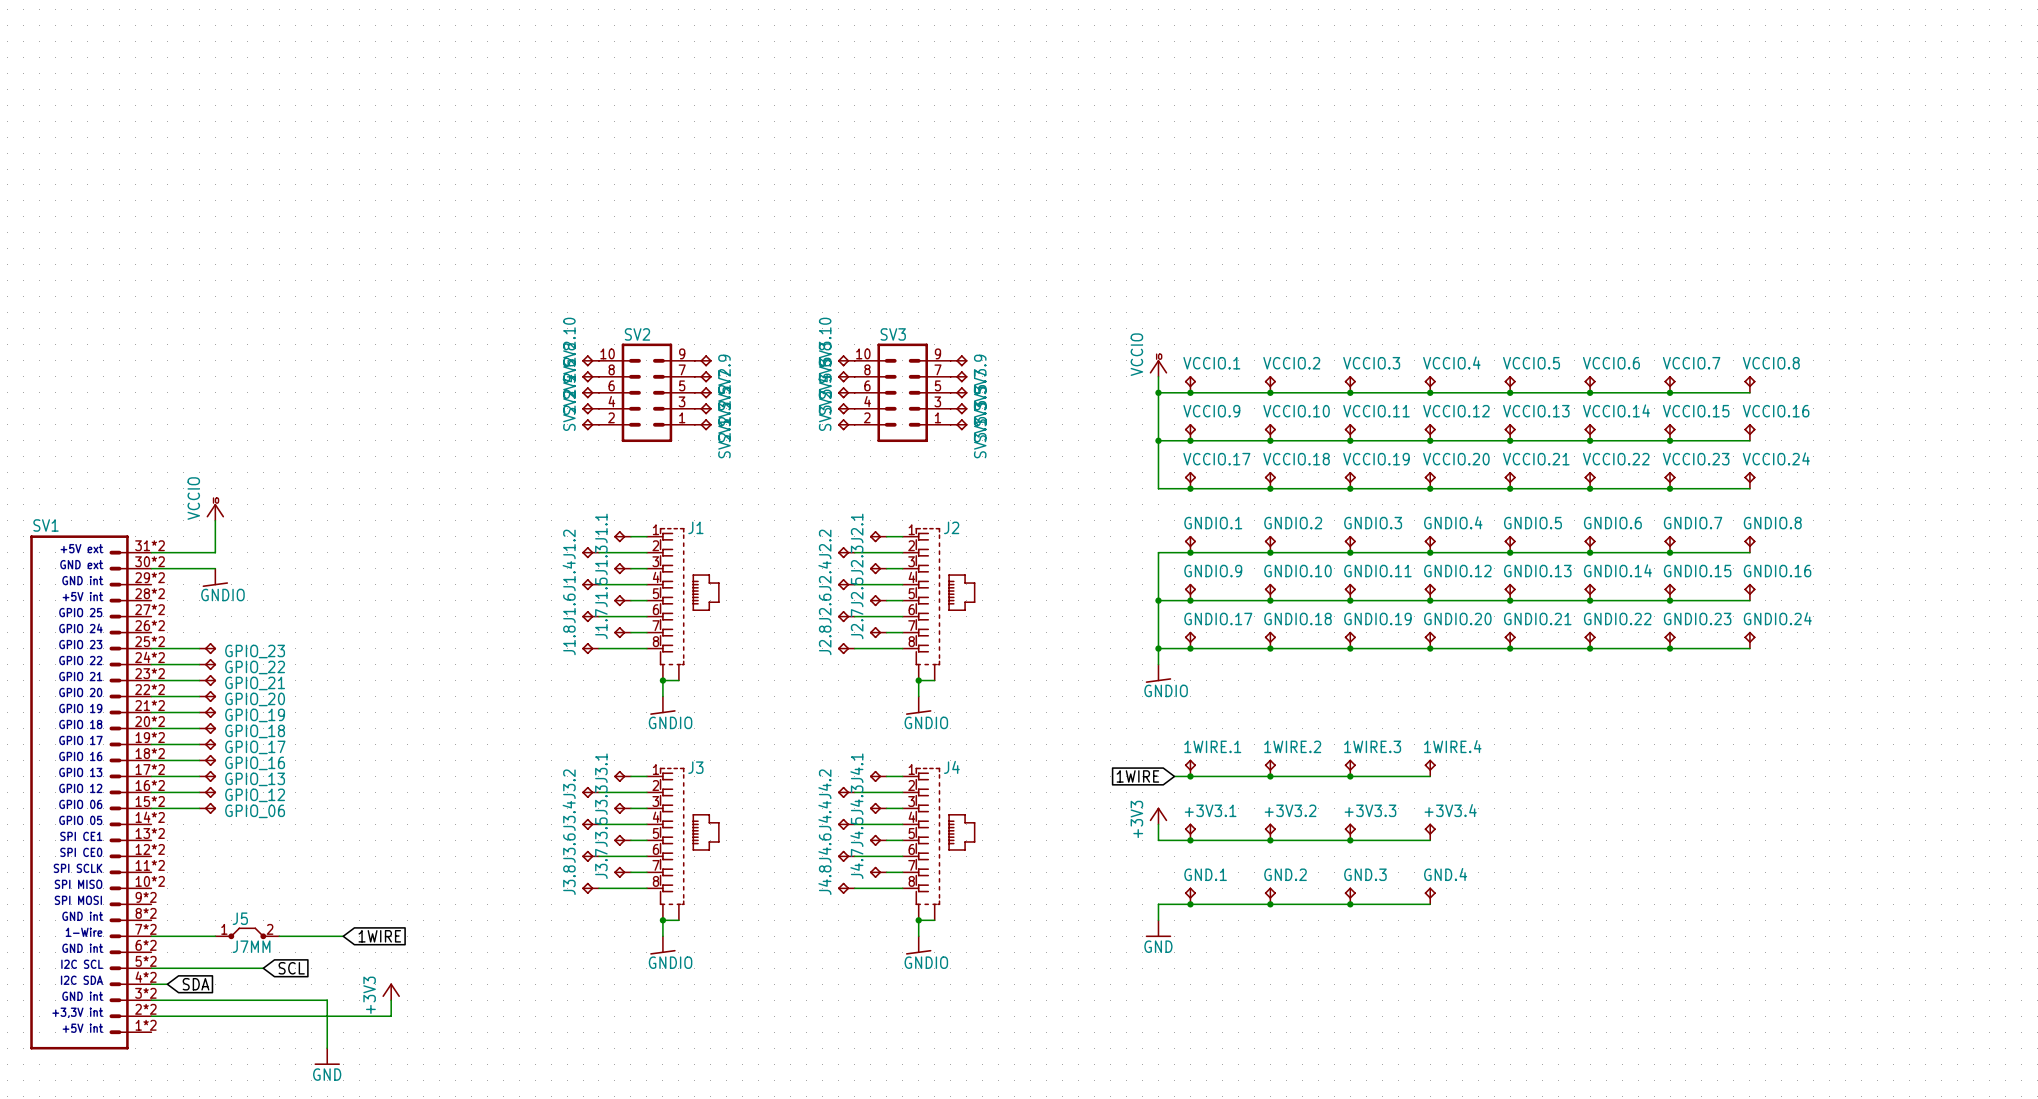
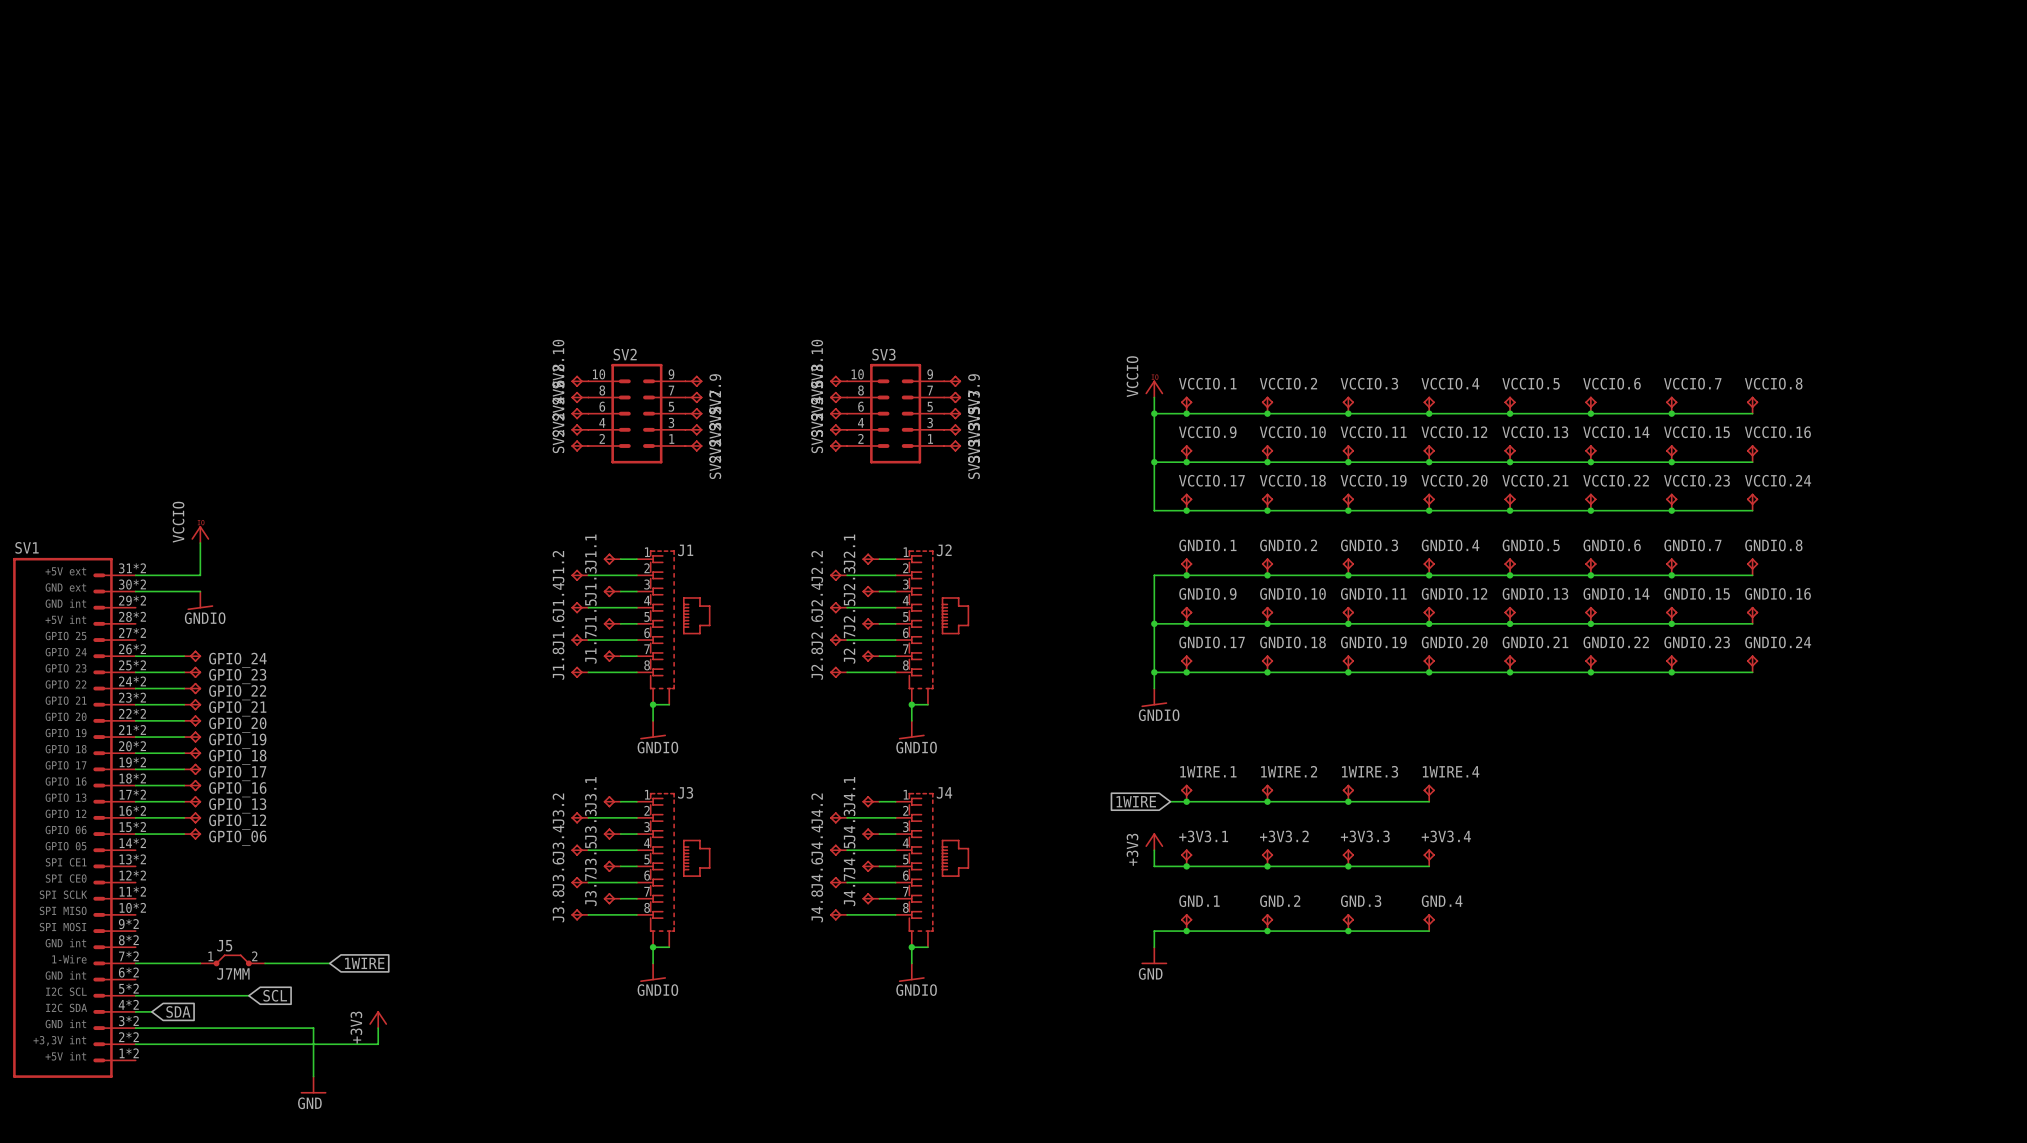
wire: none -> (135, 656) (184, 656)
GPIO_24: none -> (192, 656)

